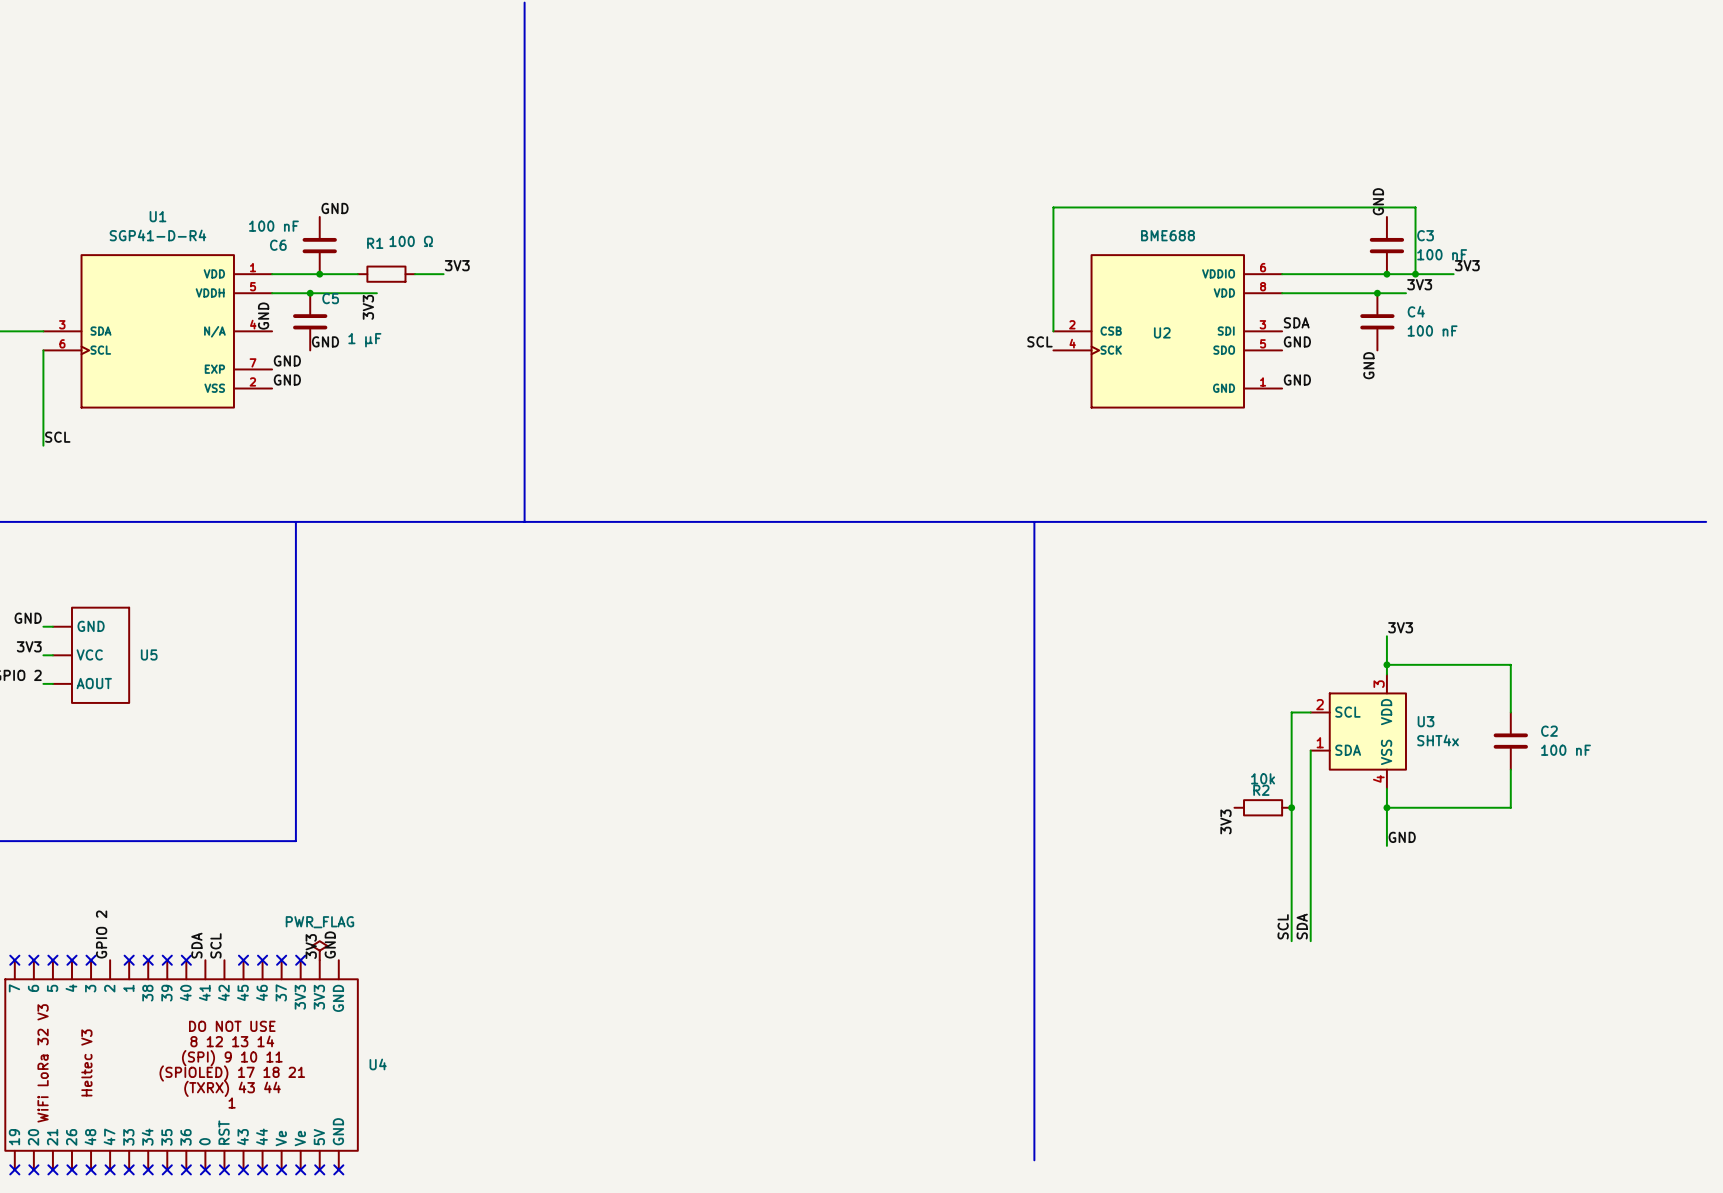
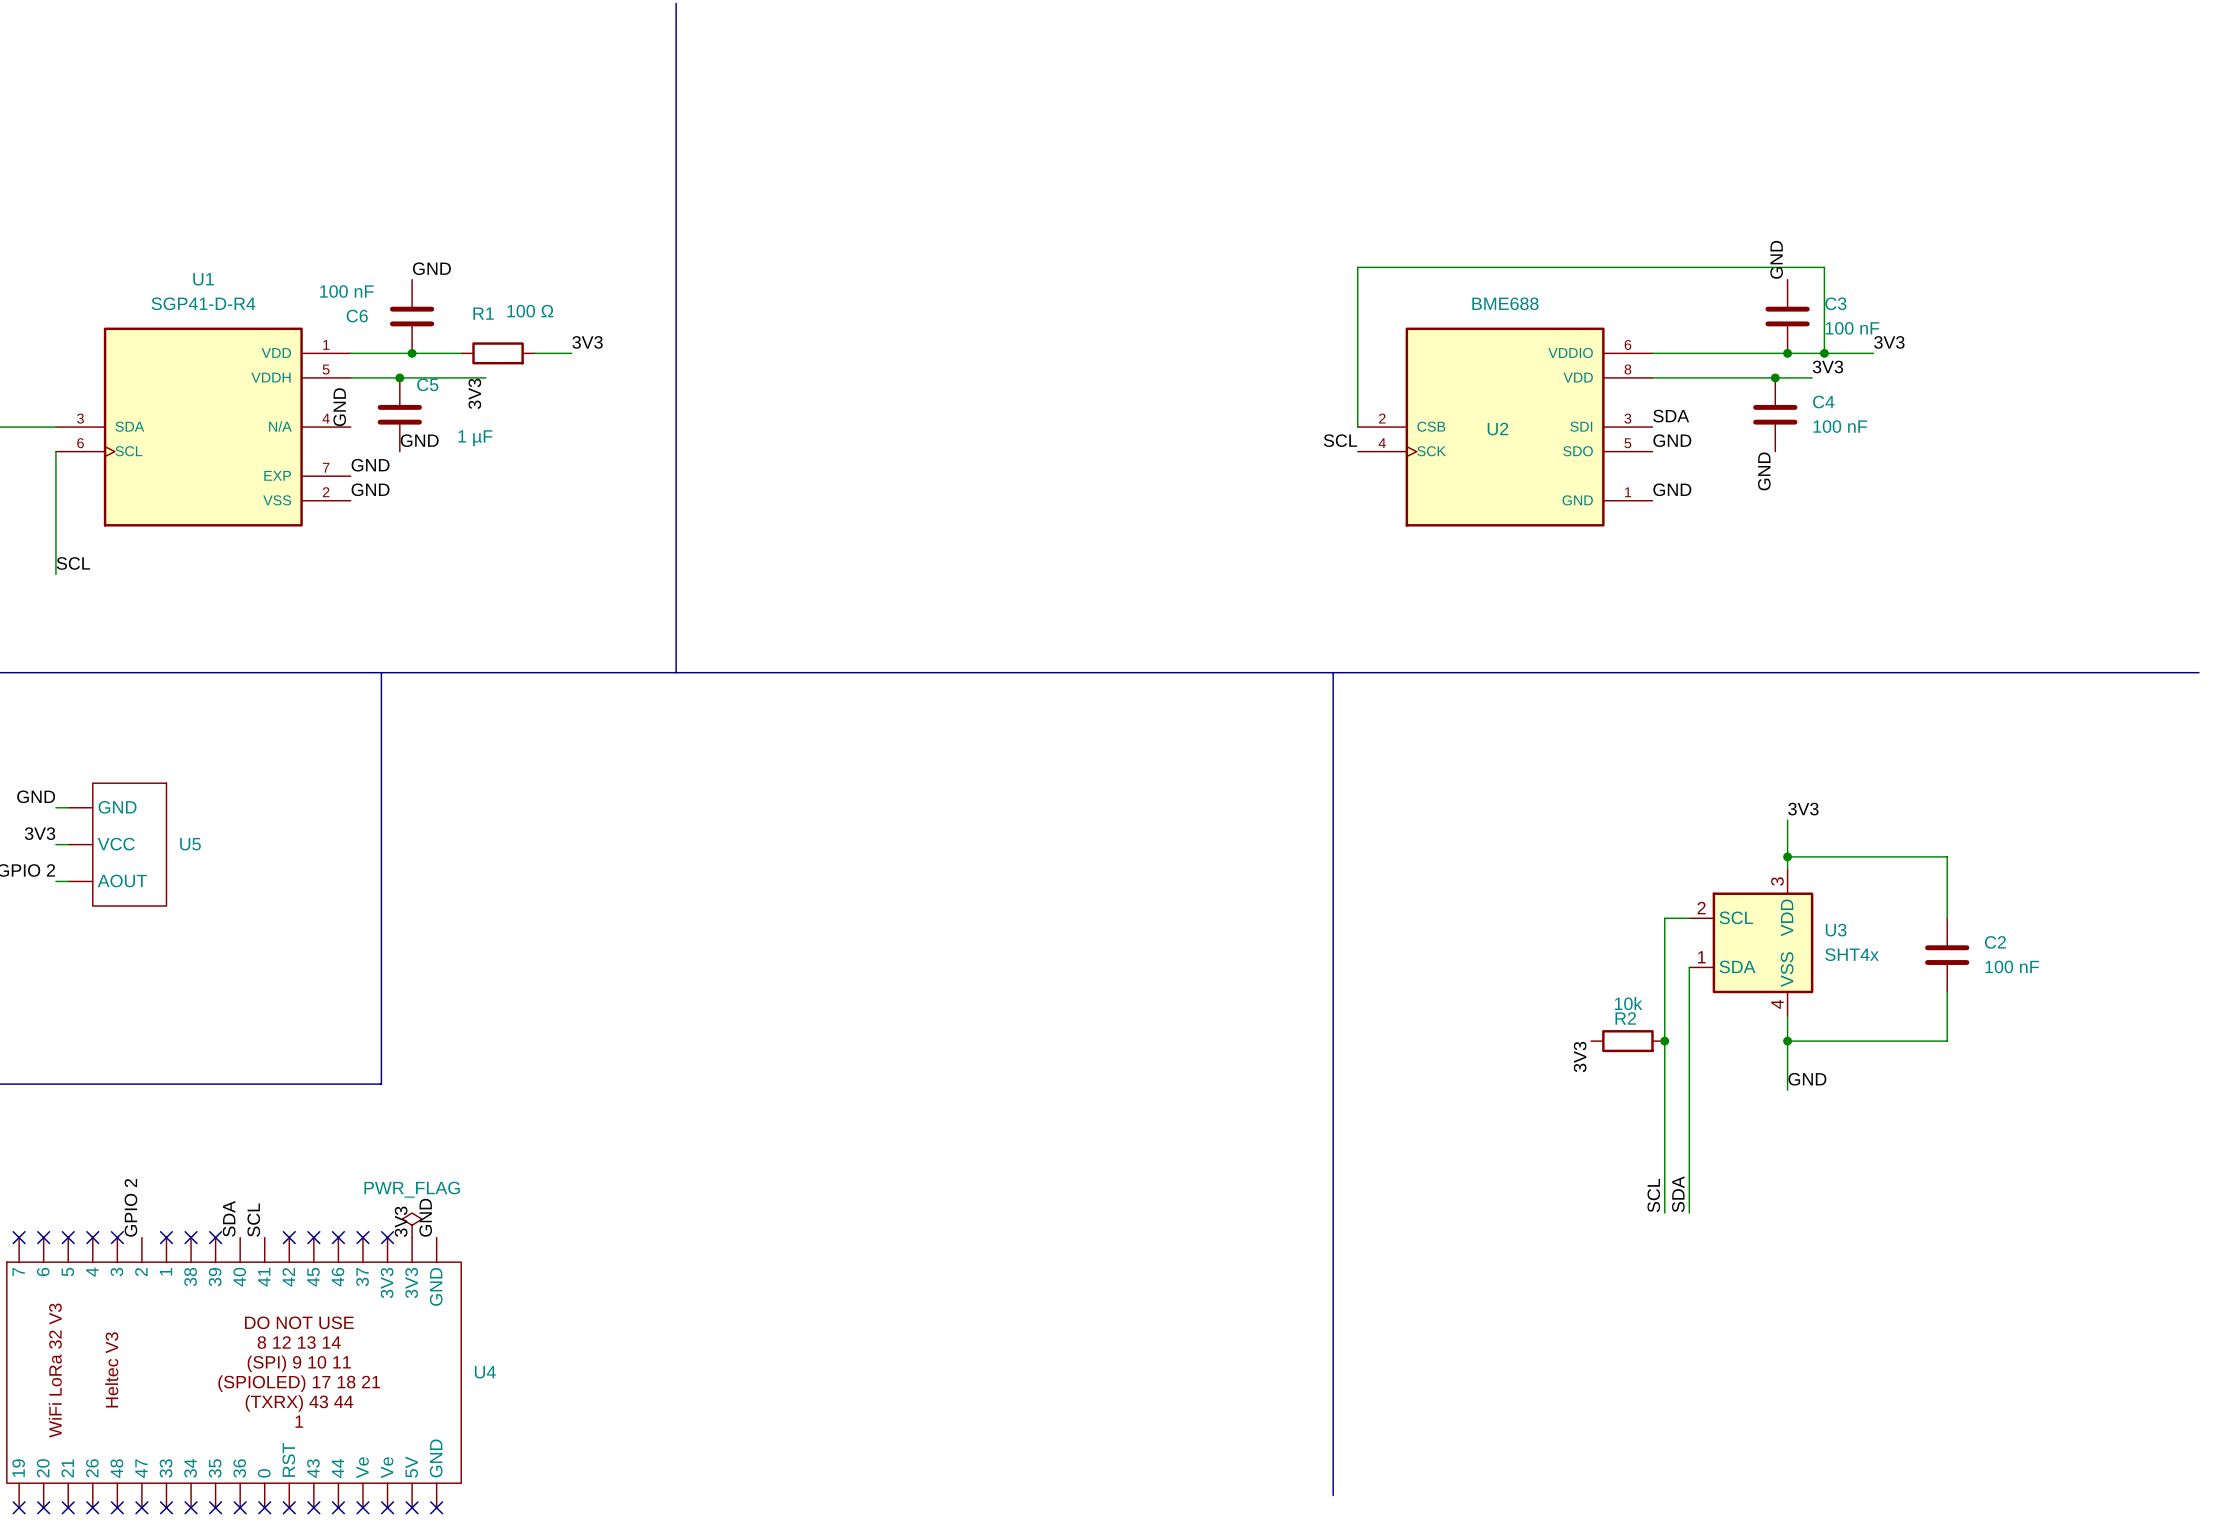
label: none -> SDA (229, 1218)
label: SDA (196, 945) -> SCL (253, 1220)
label: SCL (215, 945) -> none
no-connect mark position: (186, 960) -> (289, 1237)

